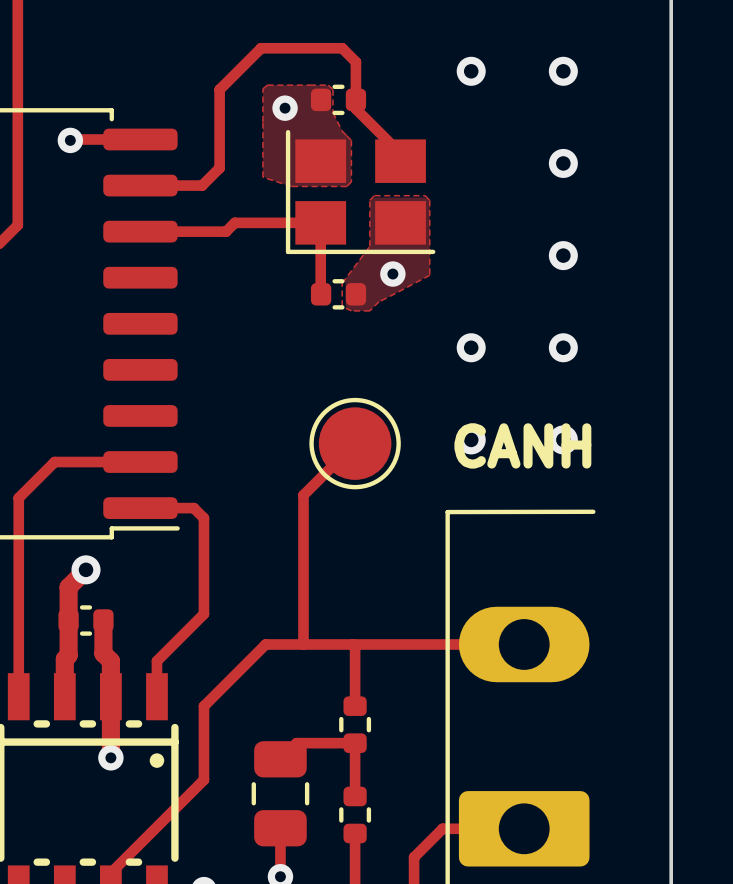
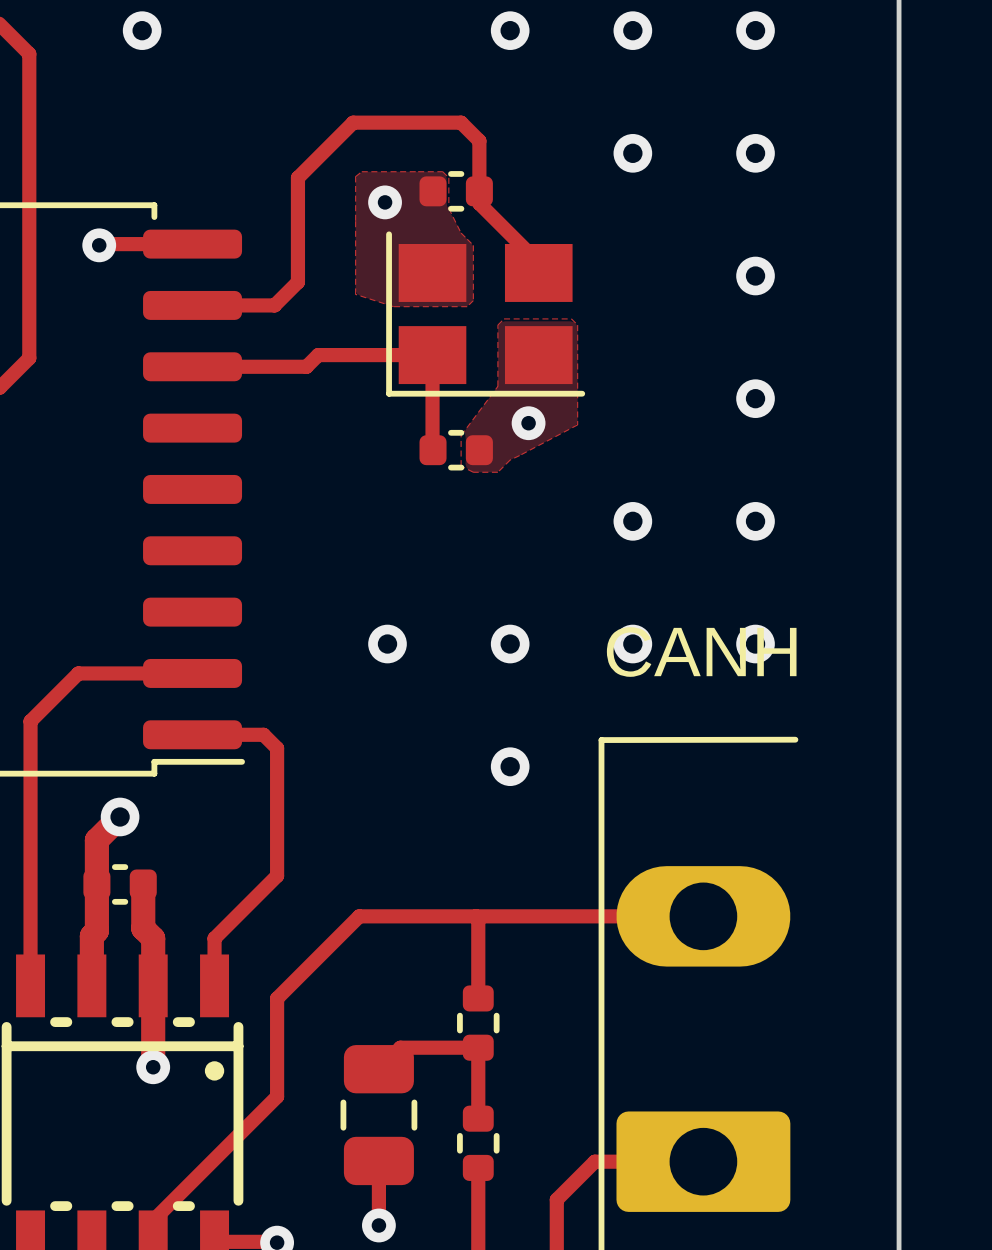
via: none -> (387, 644)
via: none -> (510, 644)
track: (355, 443) (303, 495) (303, 644) -> none
part: (355, 443) -> none
via: none -> (510, 766)

